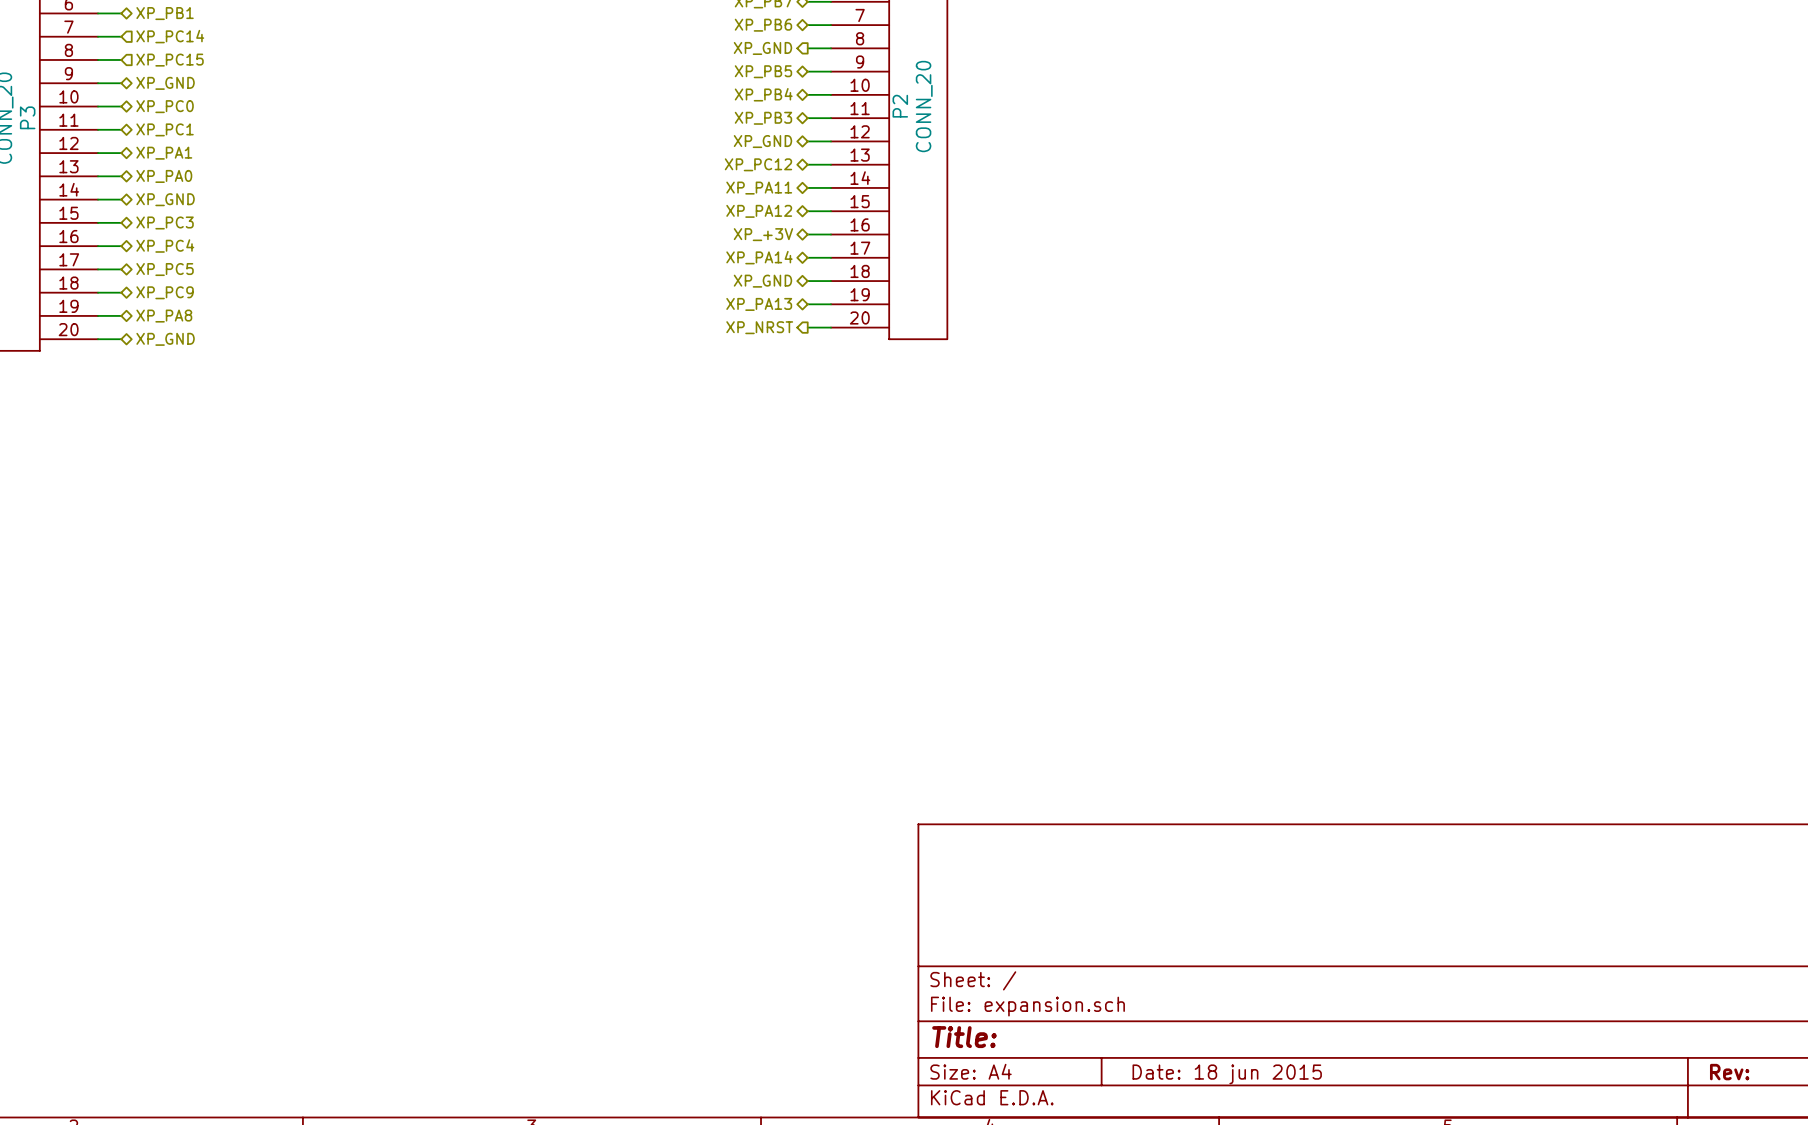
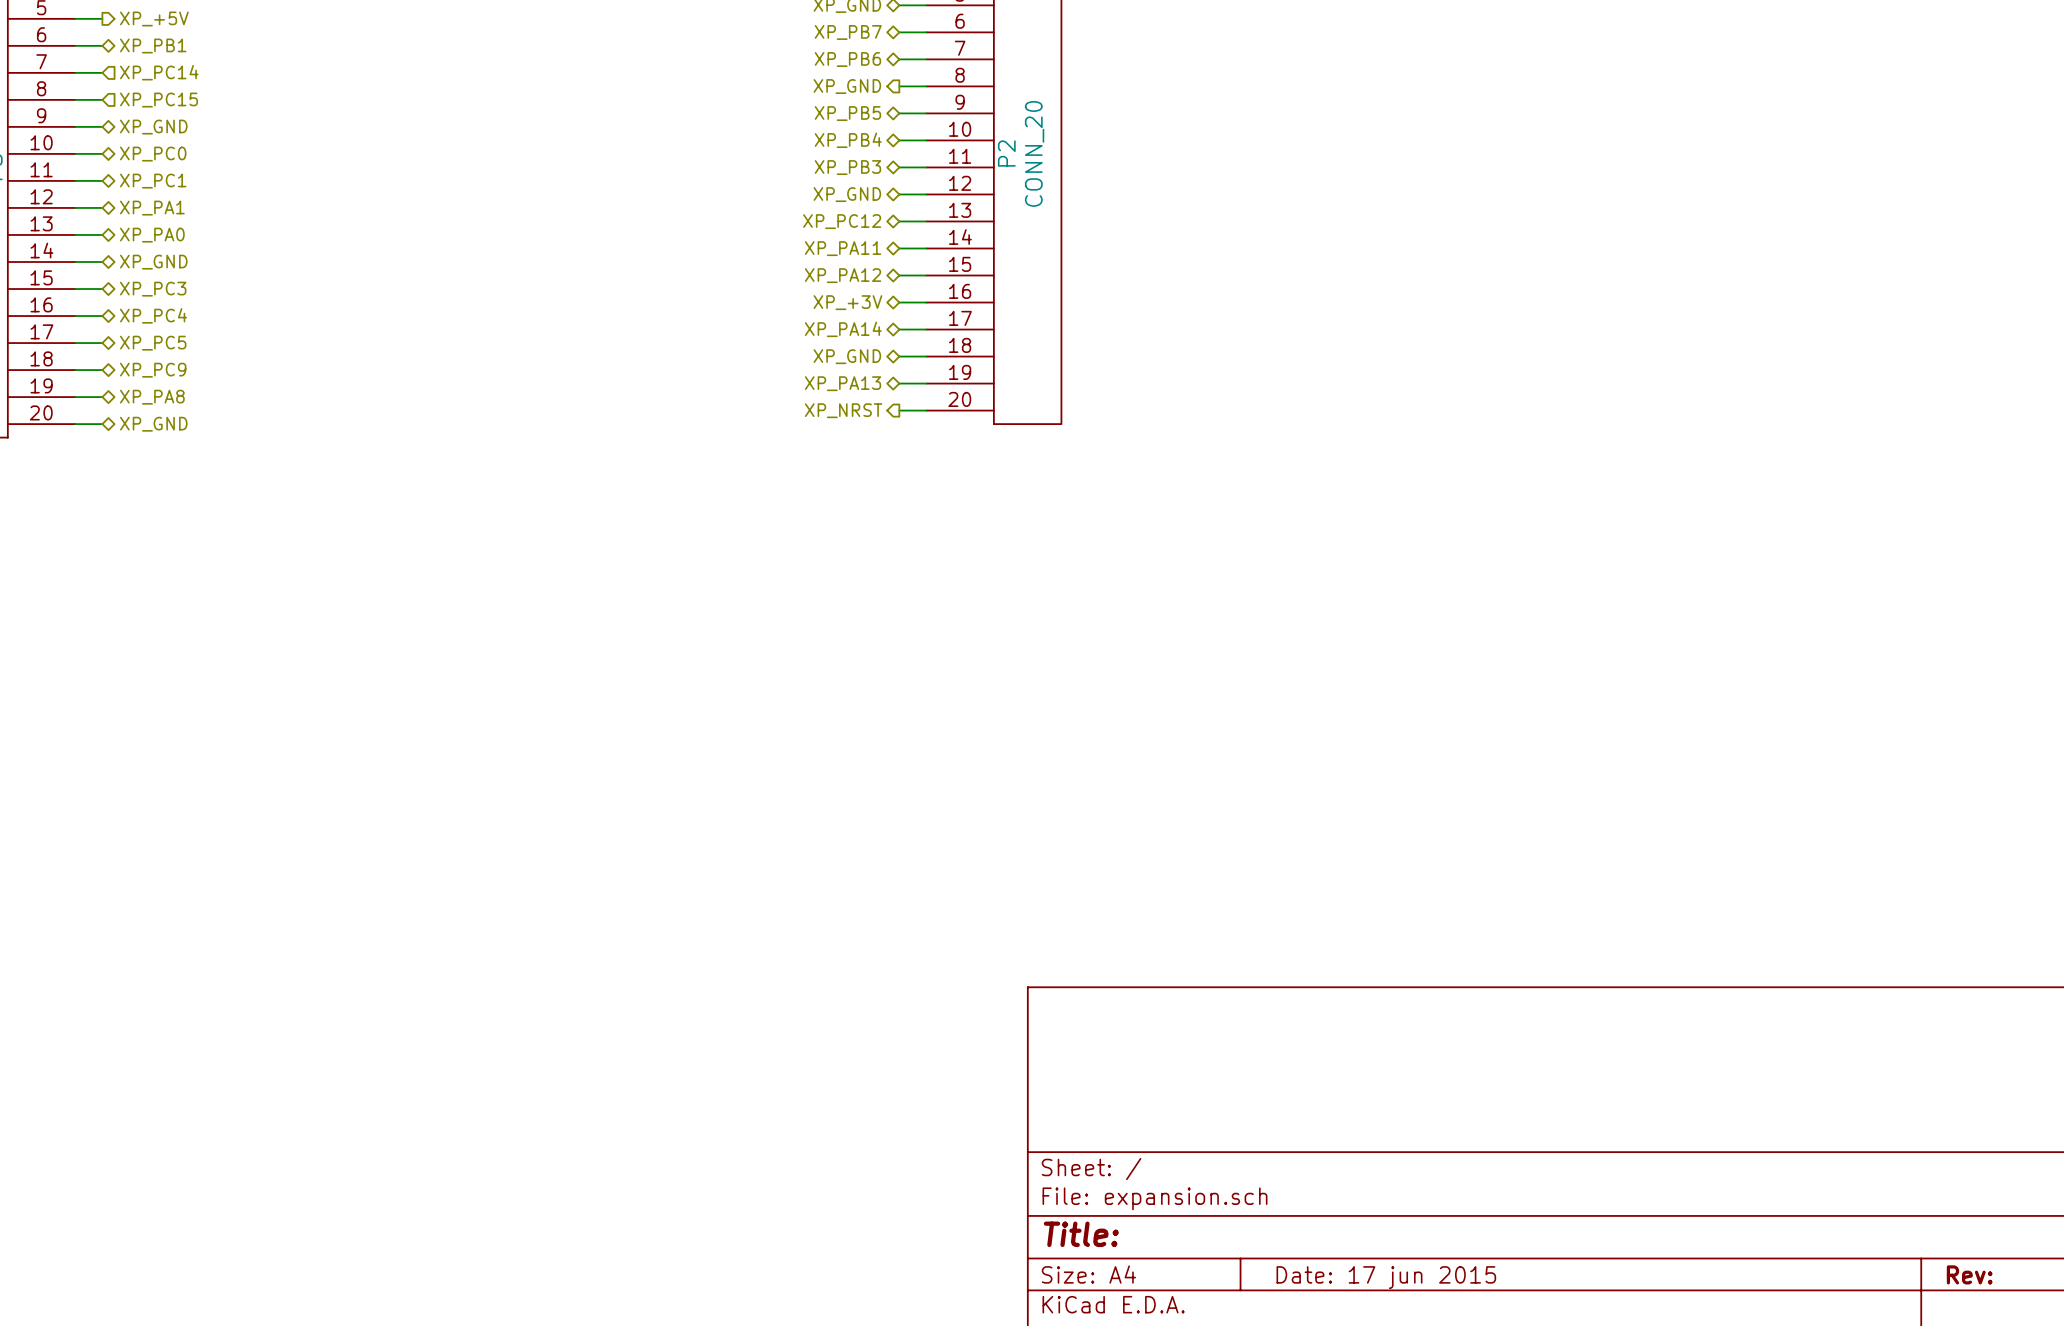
title block: Date: 18 jun 2015 (1227, 1074) -> Date: 17 jun 2015 (1386, 1277)

